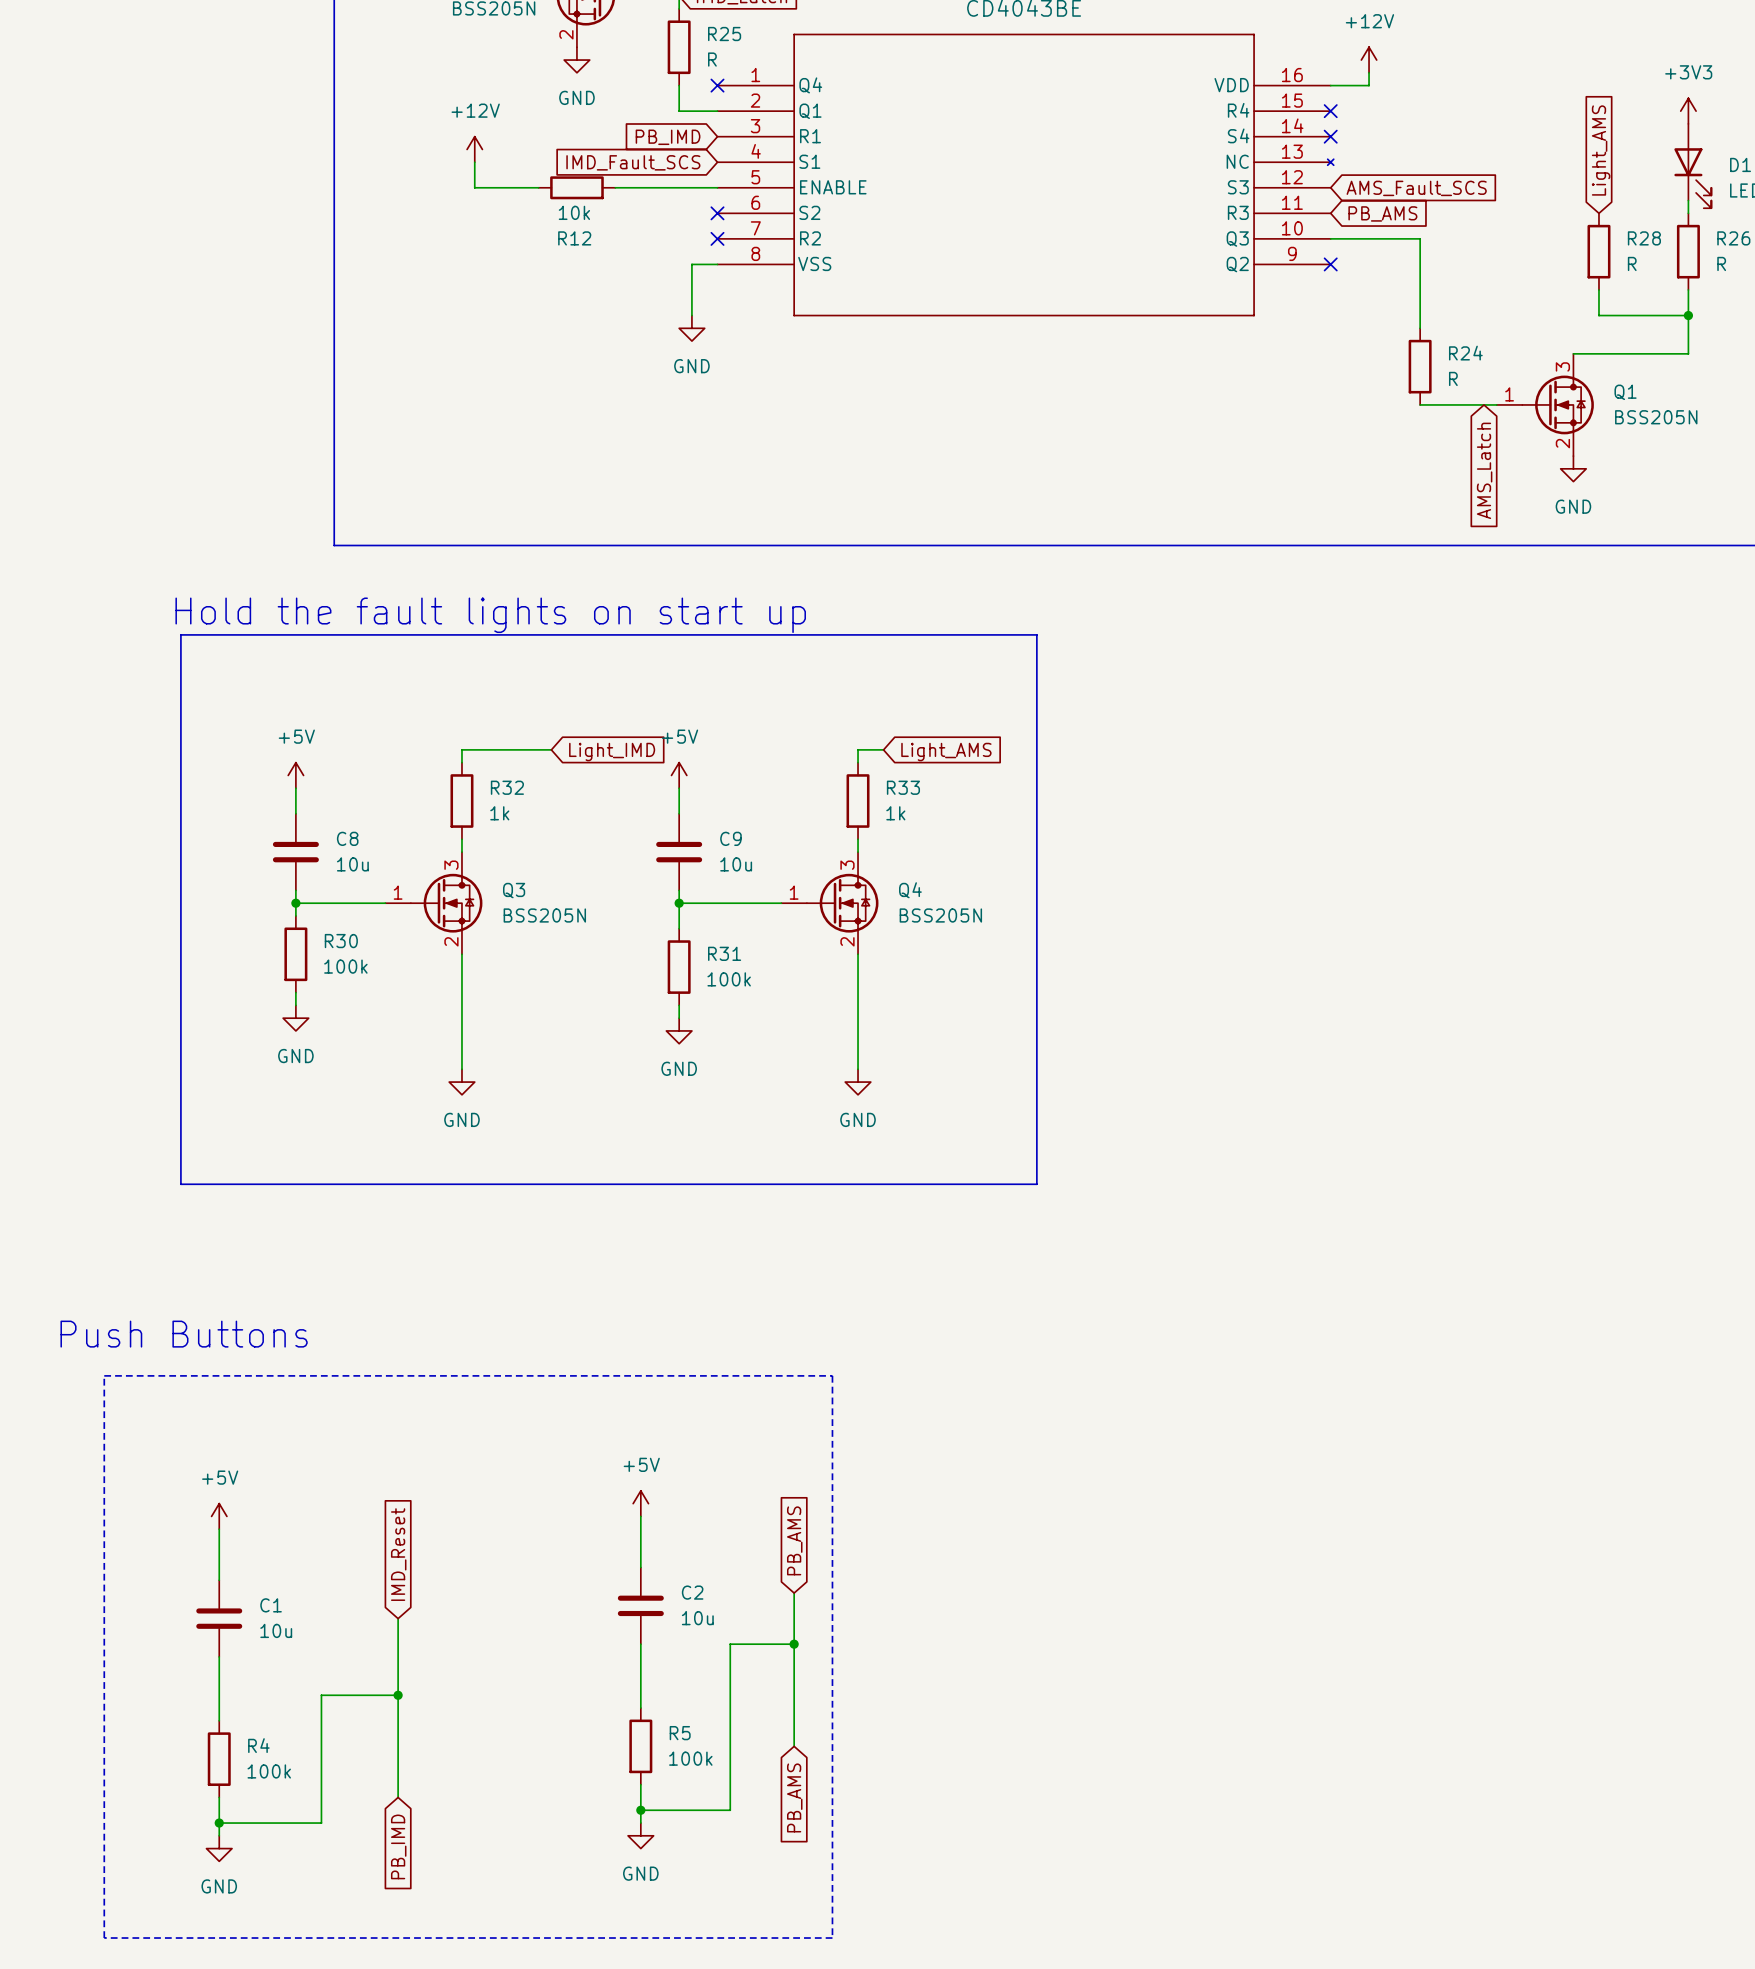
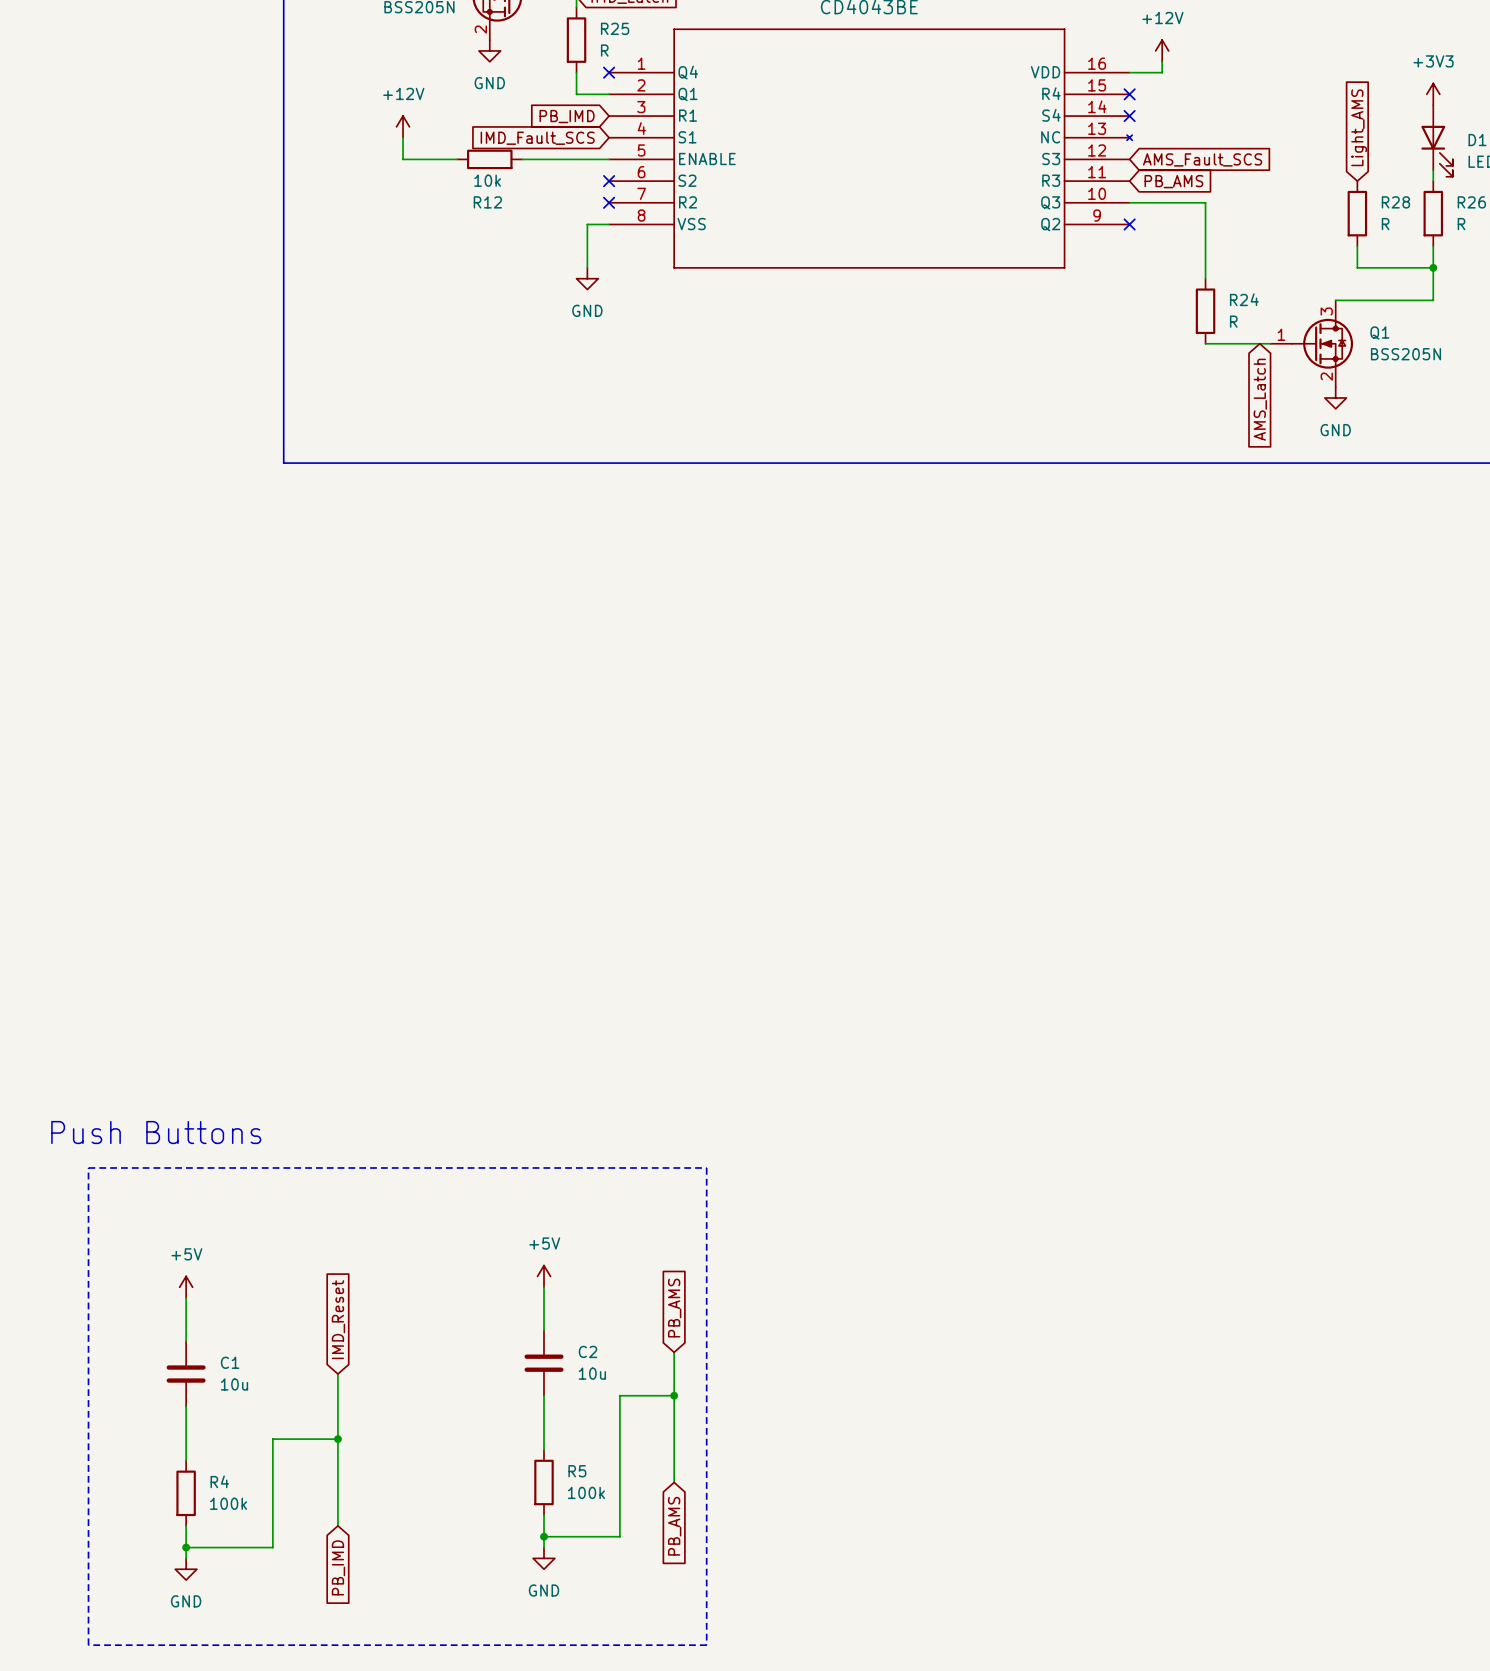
text: Hold the fault lights on start up (490, 615) -> none
line: (180, 634) (1036, 634) (1036, 1184) (180, 1184) (180, 634) -> none
wire: (551, 749) (461, 749) (461, 762) -> none
wire: (883, 749) (858, 749) (858, 762) -> none
global label: Light_IMD (612, 752) -> none
global label: Light_AMS (946, 752) -> none
power symbol: +5V (295, 775) -> none
power symbol: +5V (679, 775) -> none
wire: (295, 788) (295, 813) -> none
wire: (679, 788) (679, 813) -> none
R32: 1k (461, 801) -> none
R33: 1k (858, 801) -> none
wire: (461, 839) (461, 852) -> none
wire: (858, 839) (858, 852) -> none
C8: 10u (295, 852) -> none
C9: 10u (679, 852) -> none
wire: (295, 890) (295, 915) -> none
wire: (679, 890) (679, 928) -> none
wire: (295, 903) (385, 903) -> none
junction: (295, 903) -> none
Q3: BSS205N (433, 903) -> none
wire: (679, 903) (781, 903) -> none
junction: (679, 903) -> none
Q4: BSS205N (829, 903) -> none
R30: 100k (295, 954) -> none
wire: (461, 954) (461, 1069) -> none
wire: (858, 954) (858, 1069) -> none
R31: 100k (679, 967) -> none
wire: (295, 992) (295, 1005) -> none
wire: (679, 1005) (679, 1018) -> none
power symbol: GND (295, 1018) -> none
power symbol: GND (679, 1030) -> none
power symbol: GND (461, 1082) -> none
power symbol: GND (858, 1082) -> none

